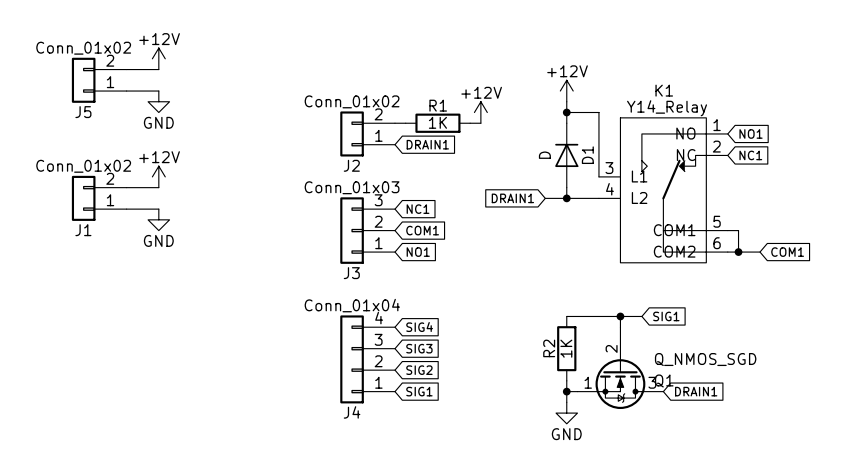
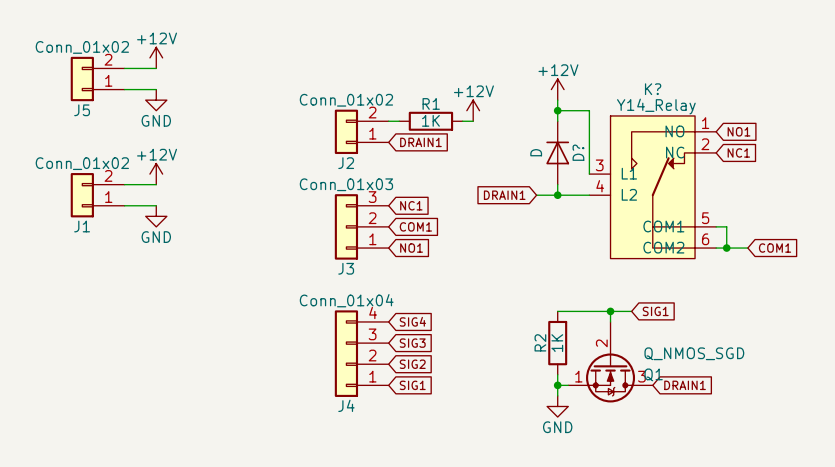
K1 name: K1 (664, 90) -> K? (653, 89)
D1 name: D1 (587, 155) -> D? (578, 152)

